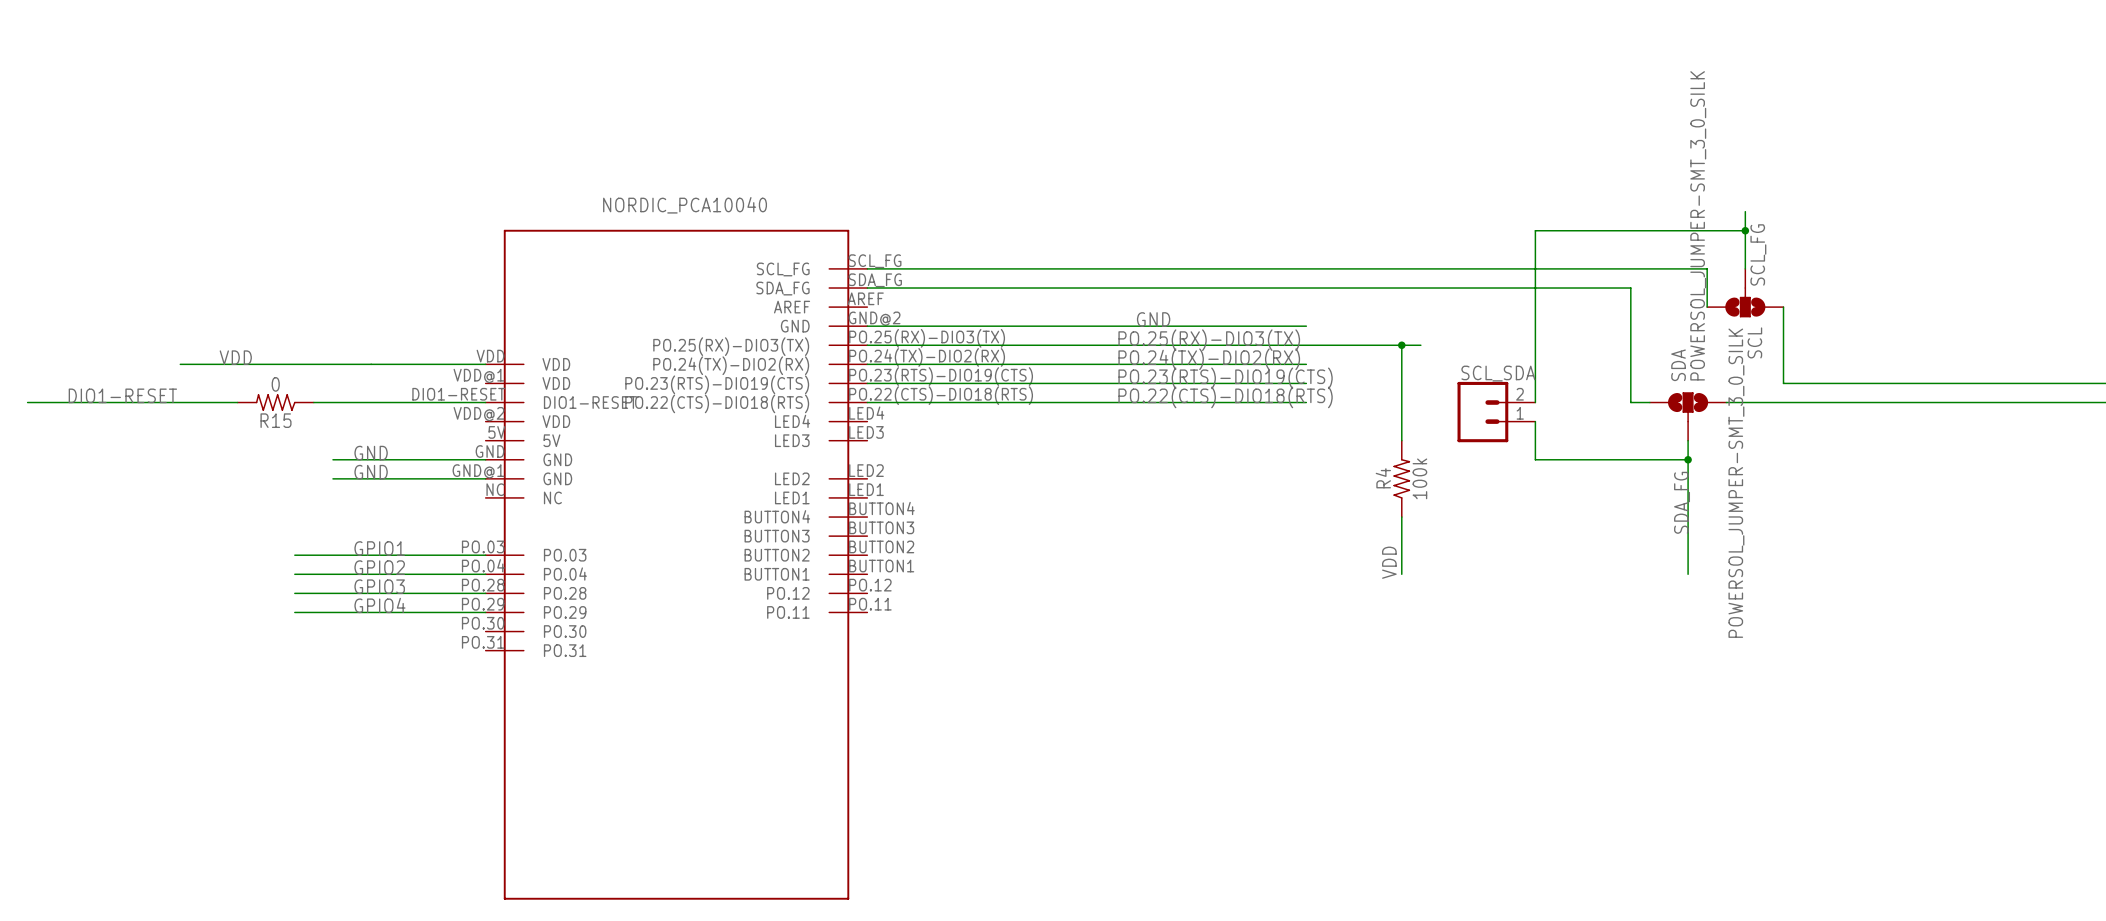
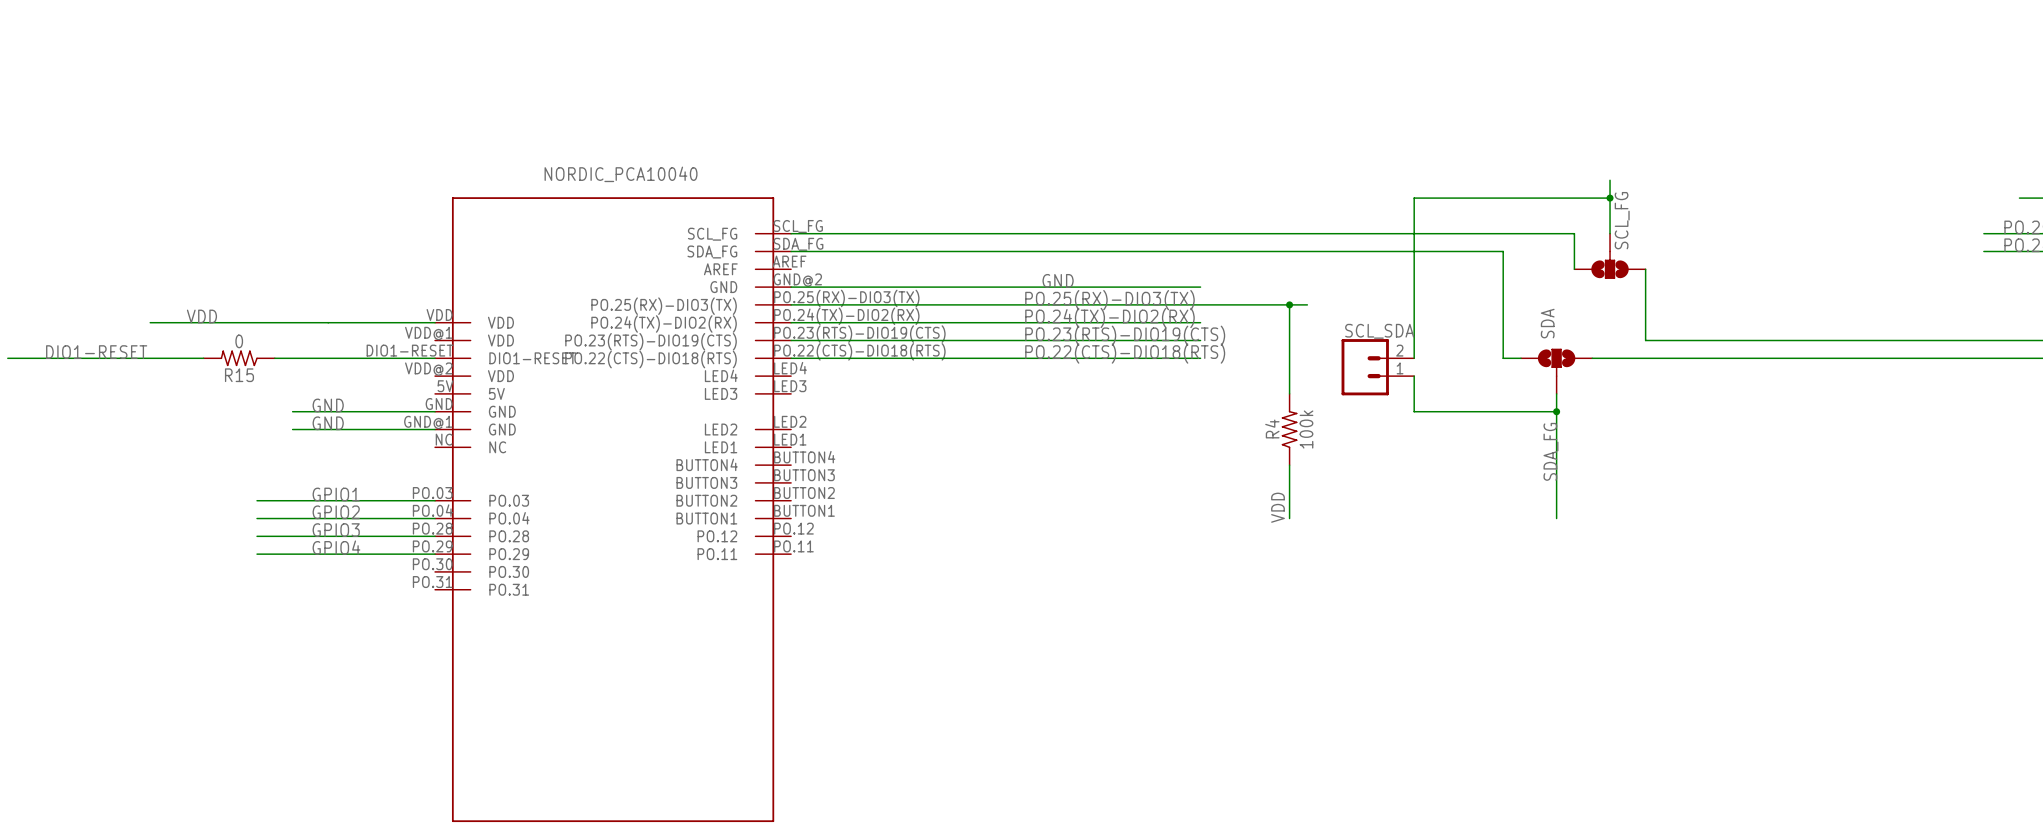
SDA value: POWERSOL_JUMPER-SMT_3_0_SILK (1698, 225) -> none
SCL name: SCL (1754, 342) -> none
SCL value: POWERSOL_JUMPER-SMT_3_0_SILK (1736, 483) -> none

